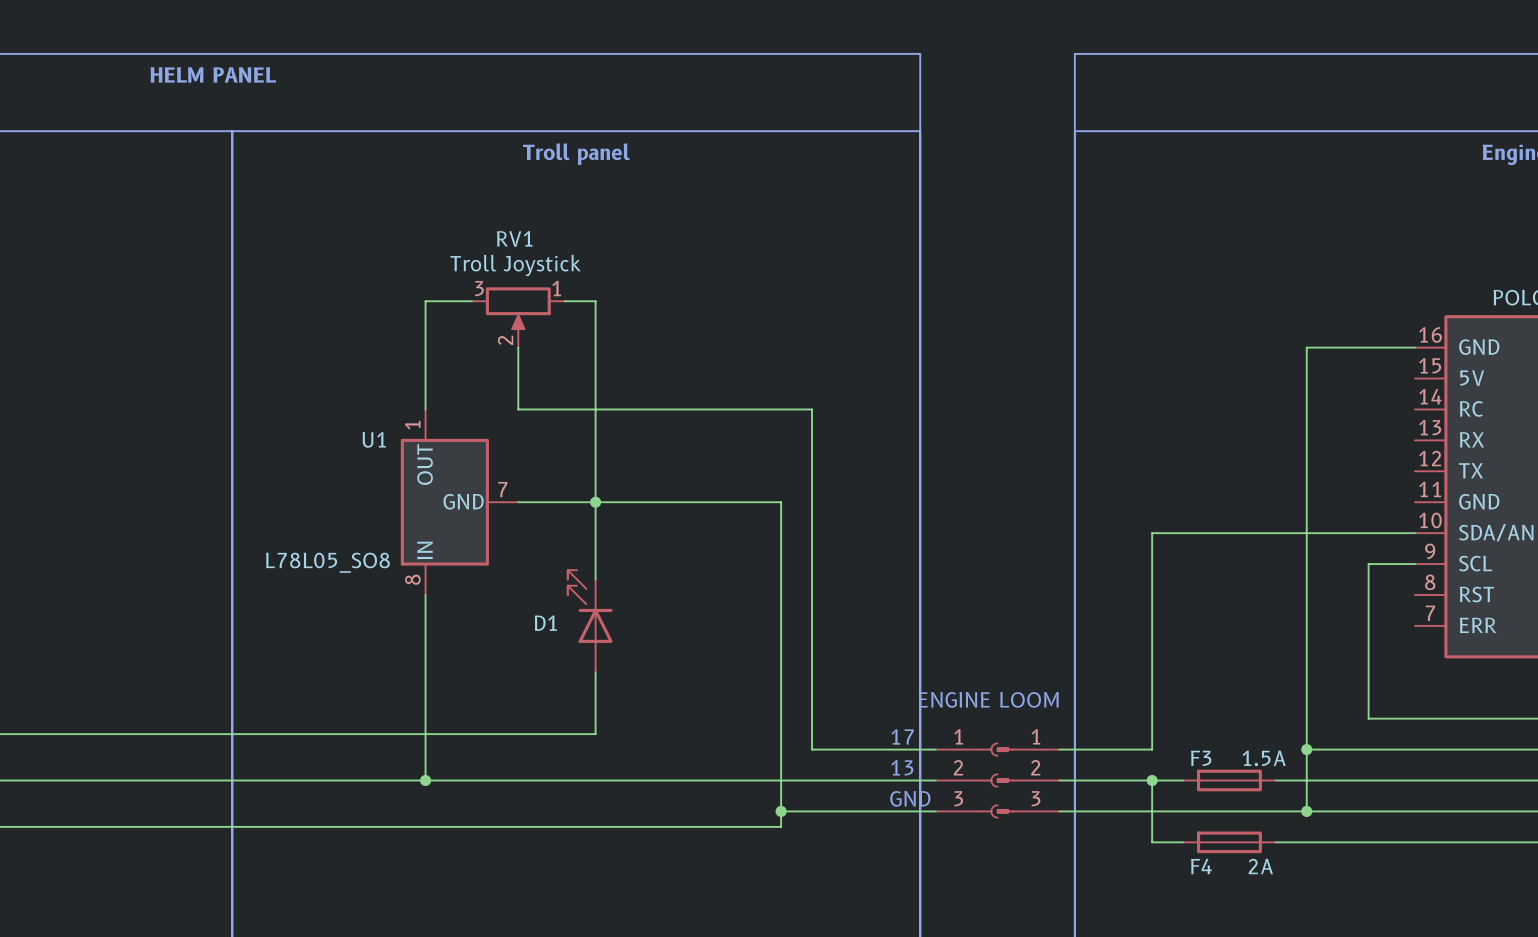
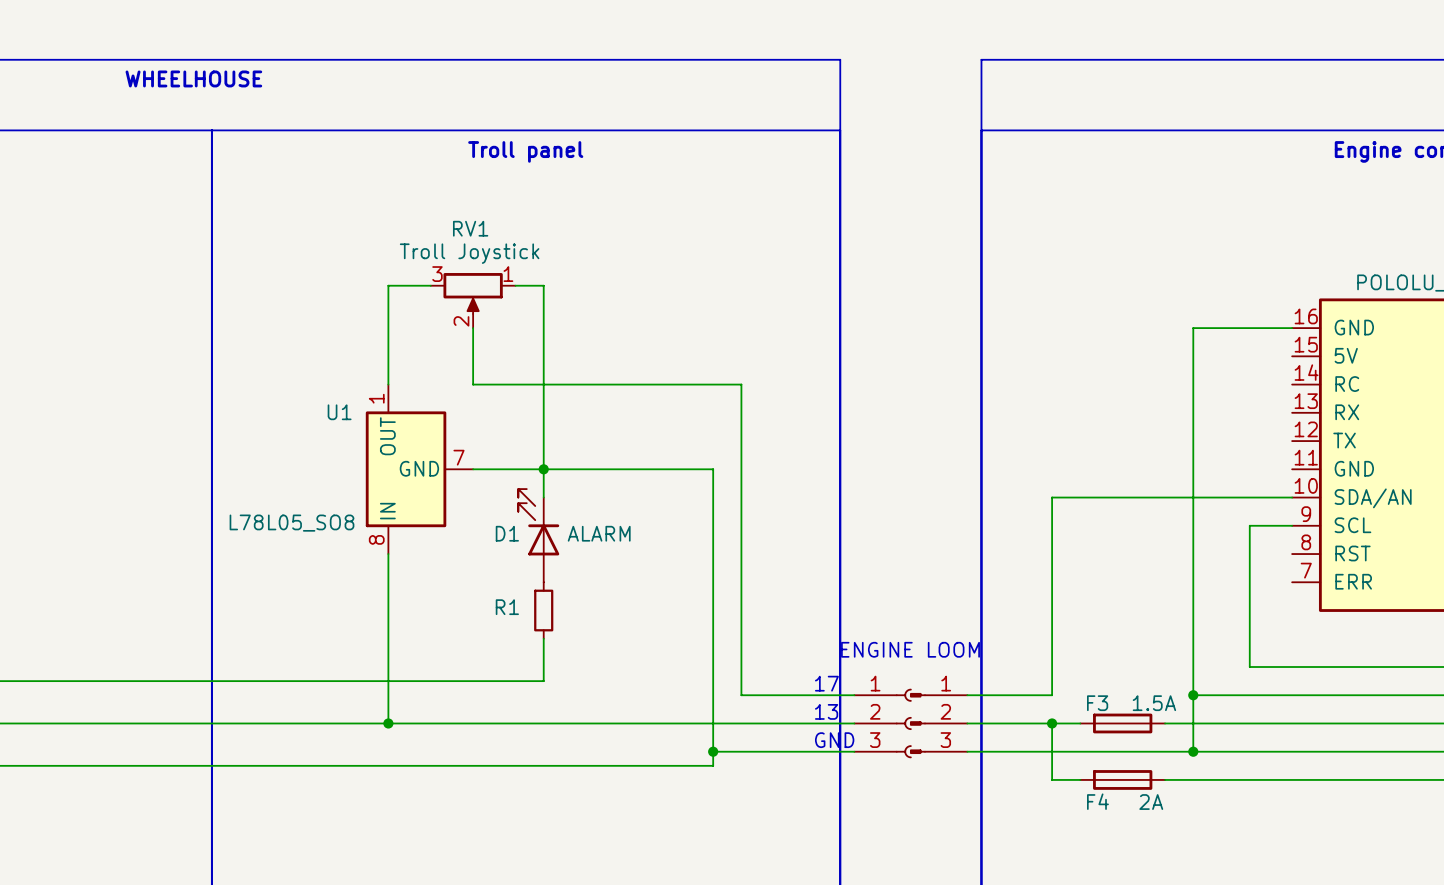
text: HELM PANEL (213, 74) -> WHEELHOUSE (193, 78)
D1 value: none -> ALARM (599, 533)
D1 position: (590, 621) -> (538, 535)
D1 name position: D1 (545, 623) -> D1 (507, 533)
R1: none -> (543, 610)

